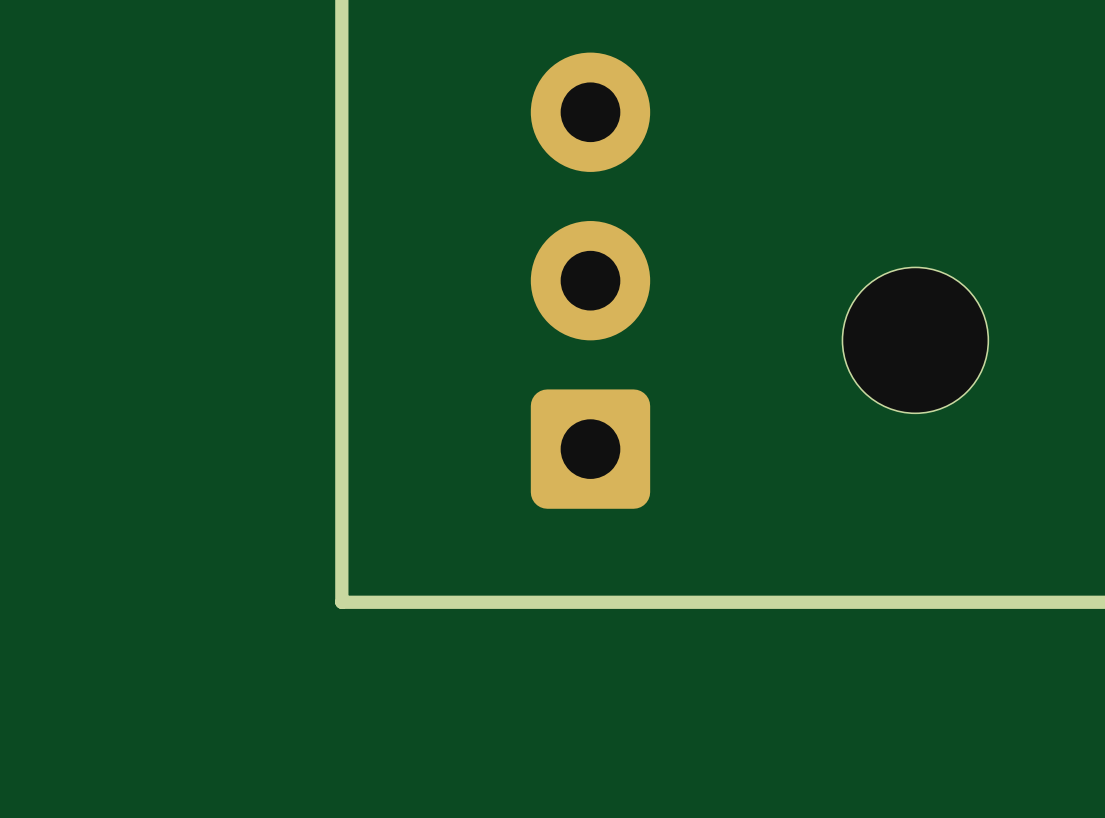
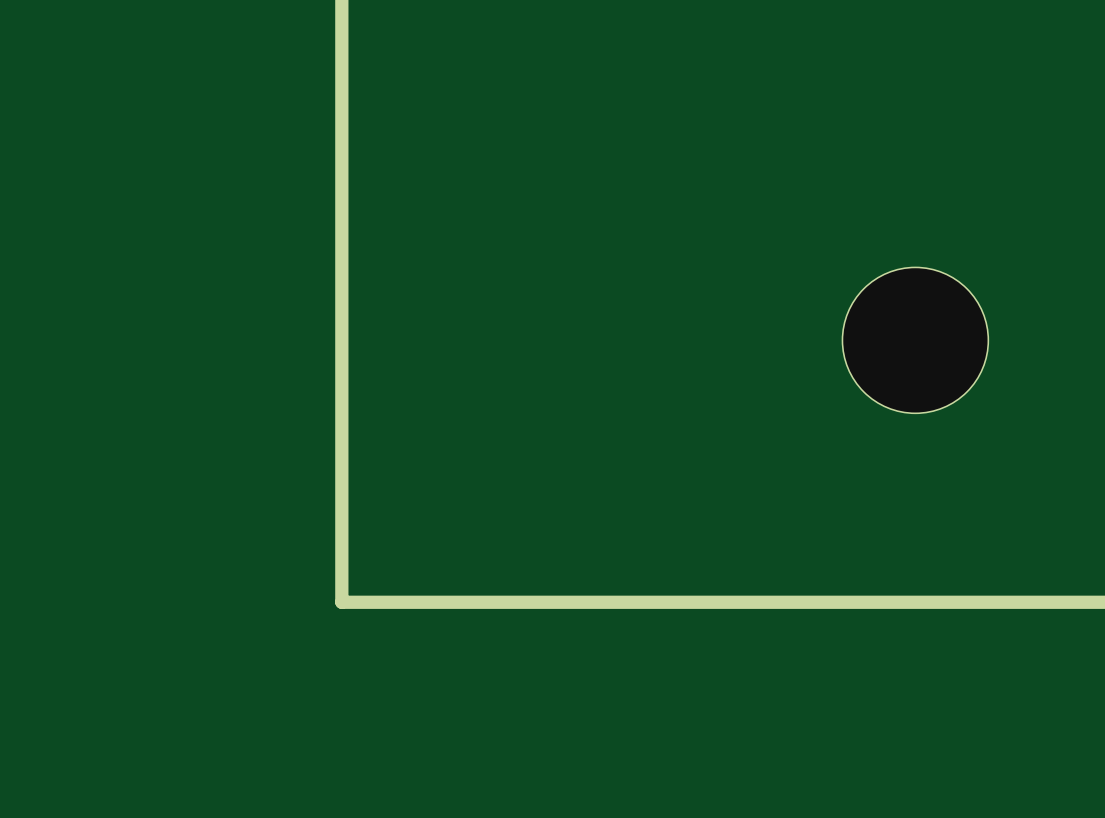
part: (590, 280) -> none

